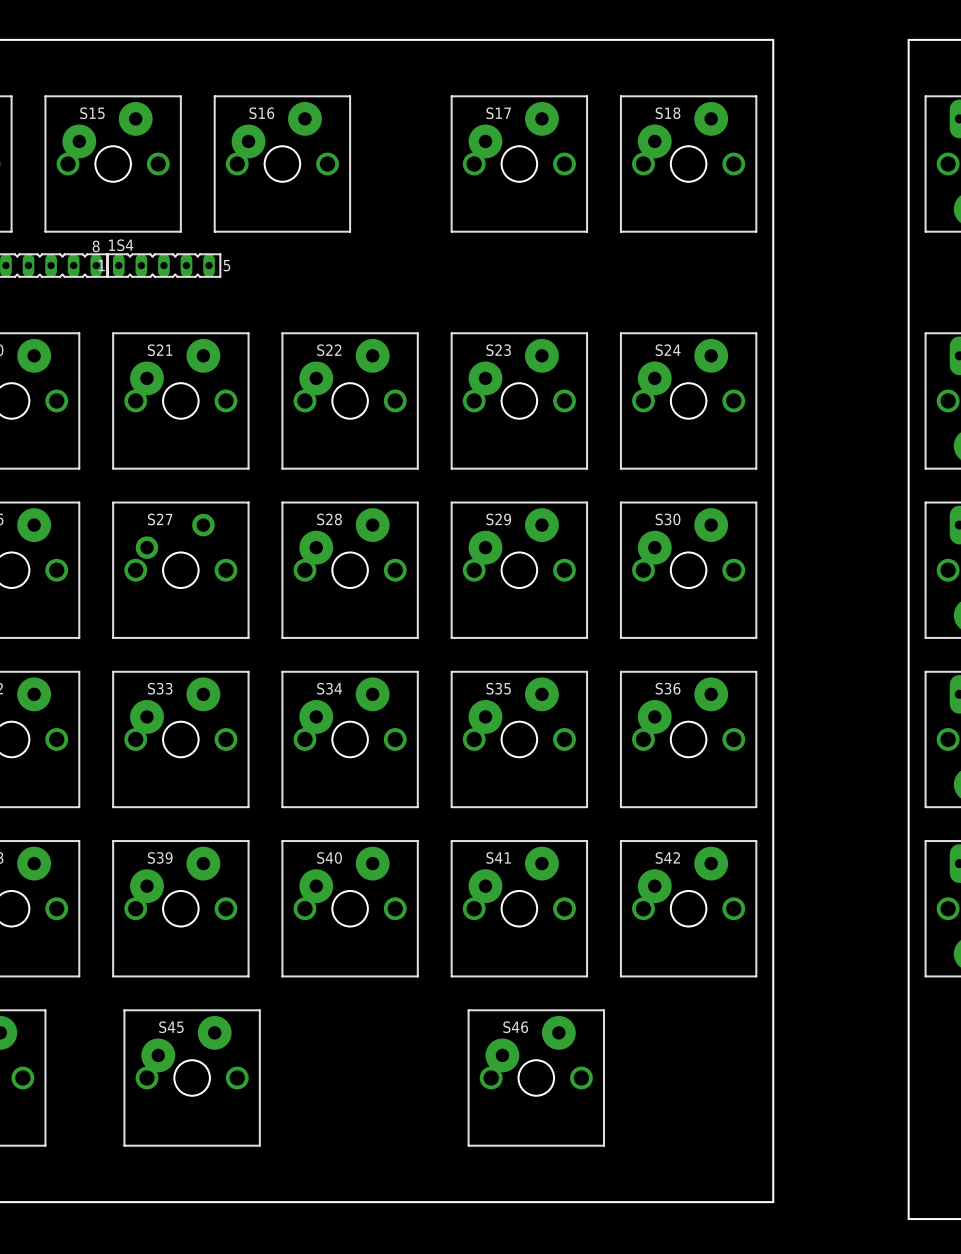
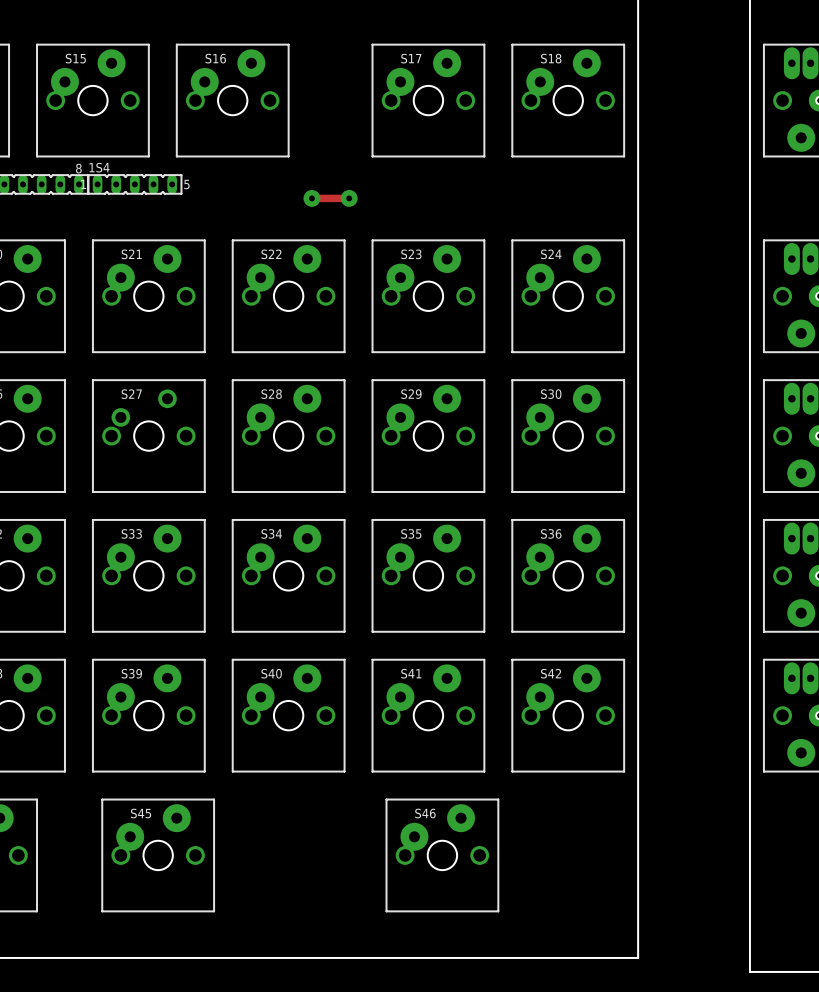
track: none -> (311, 198) (349, 198)
via: none -> (311, 198)
via: none -> (349, 198)

